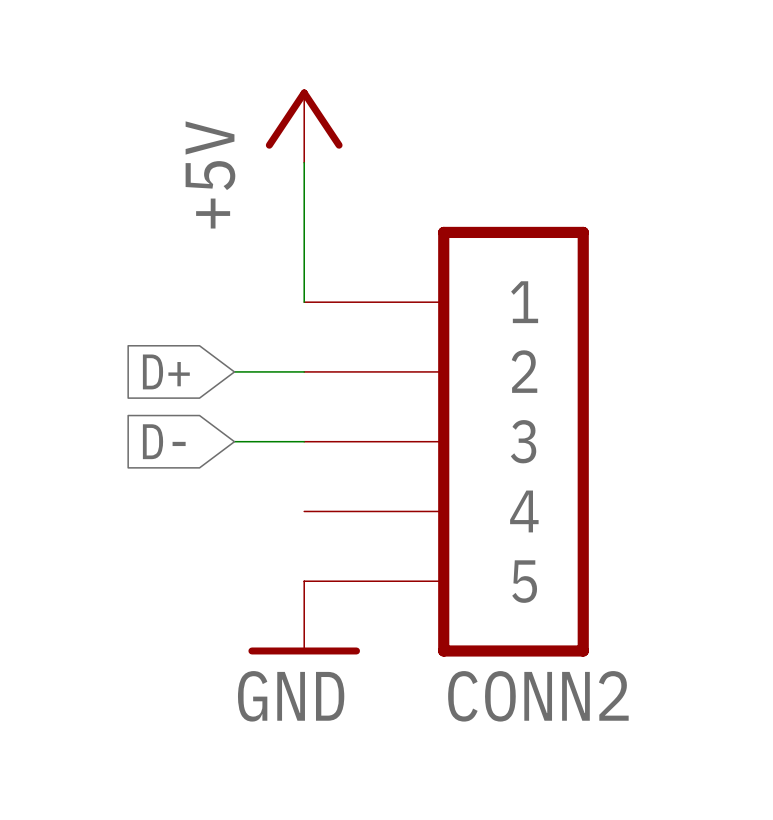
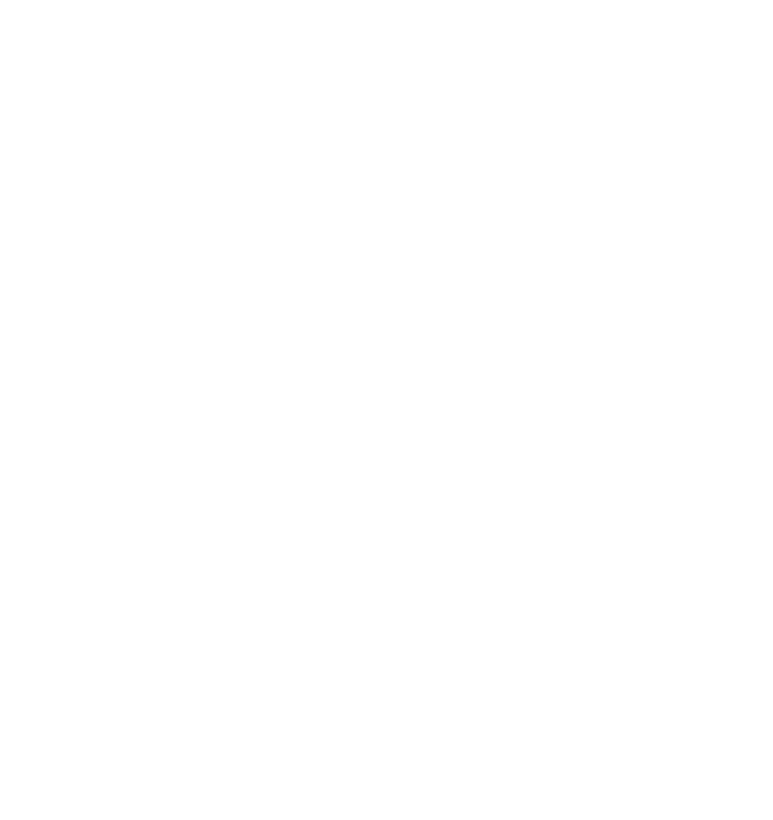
power symbol: +5V (304, 126) -> none
wire: (304, 162) (304, 302) -> none
global label: D+ (166, 371) -> none
wire: (234, 371) (304, 371) -> none
global label: D- (164, 441) -> none
wire: (234, 441) (304, 441) -> none
CONN2: (446, 441) -> none
power symbol: GND (304, 617) -> none

